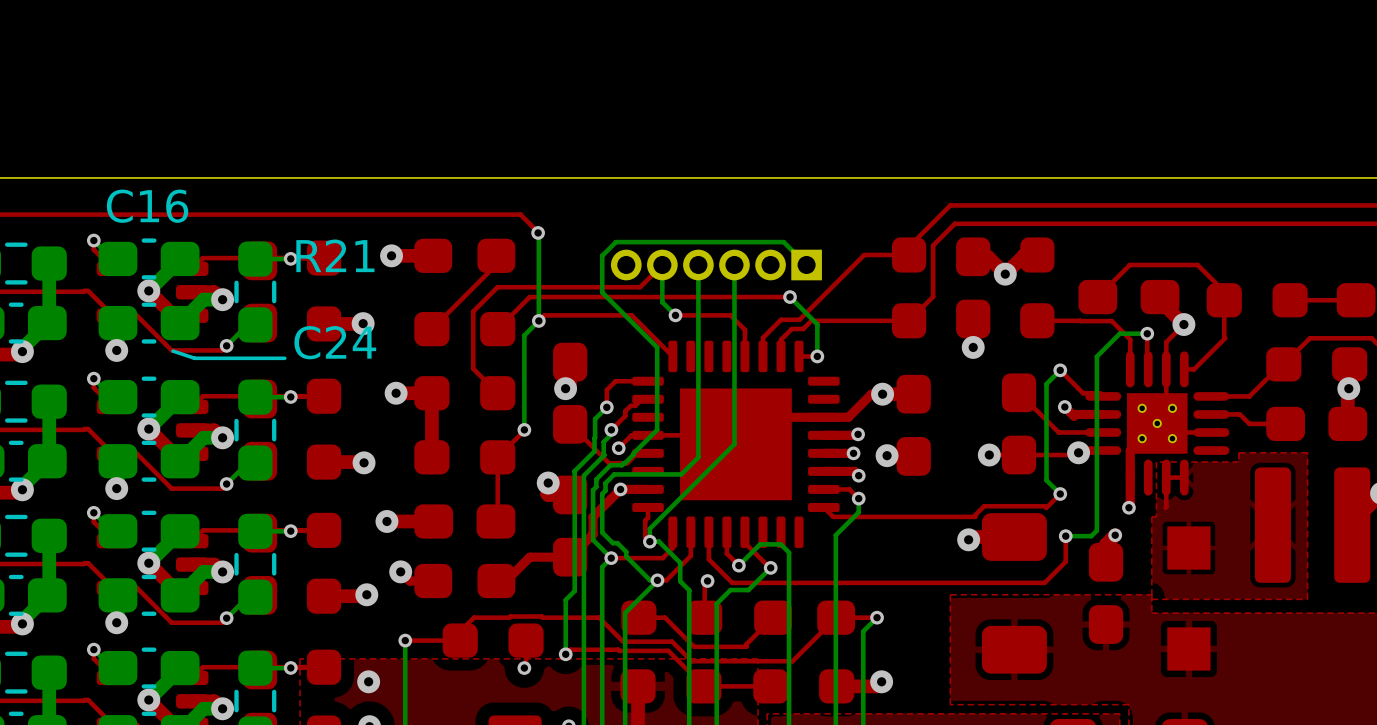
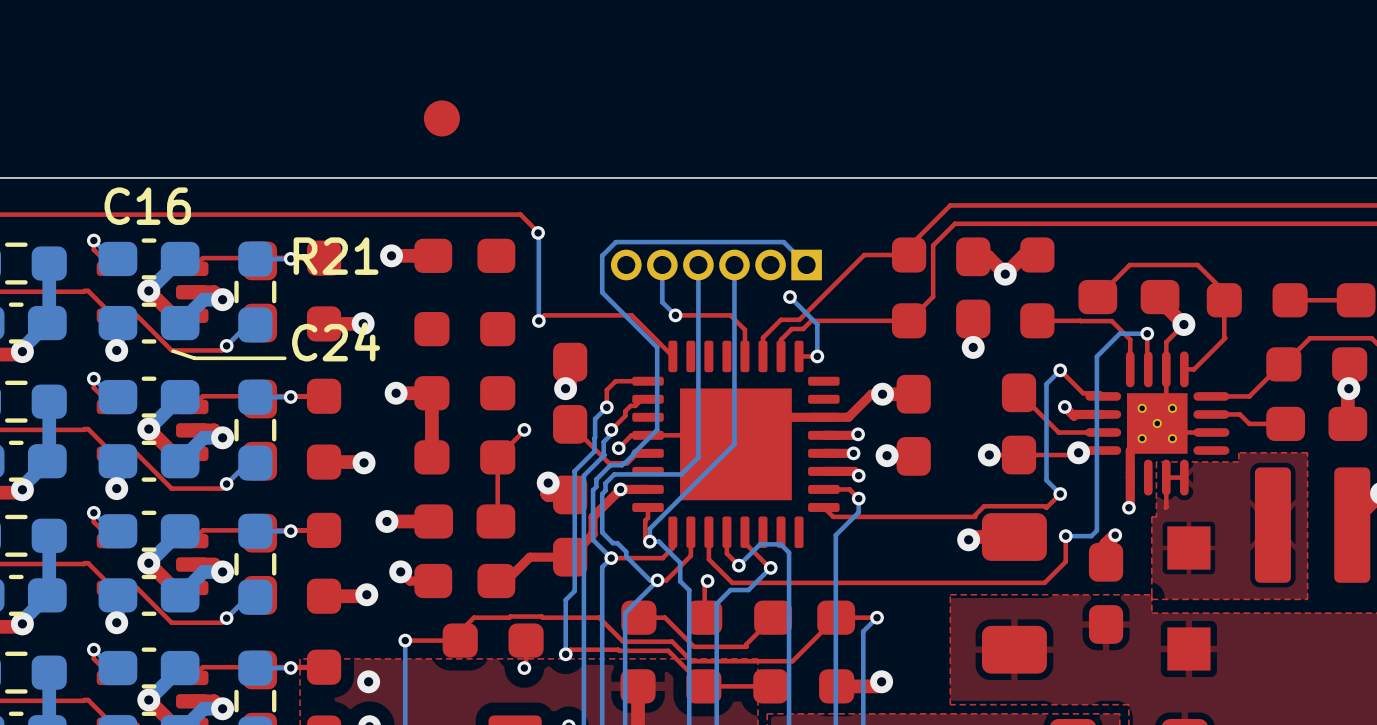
part: none -> (441, 118)
top track: (496, 255) (496, 264) (431, 329) -> none
top track: (662, 264) (640, 287) (497, 287) (473, 311) (473, 368) (497, 393) -> none
top track: (790, 297) (529, 297) (497, 329) -> none
bottom track: (538, 320) (524, 335) (524, 429) -> none

